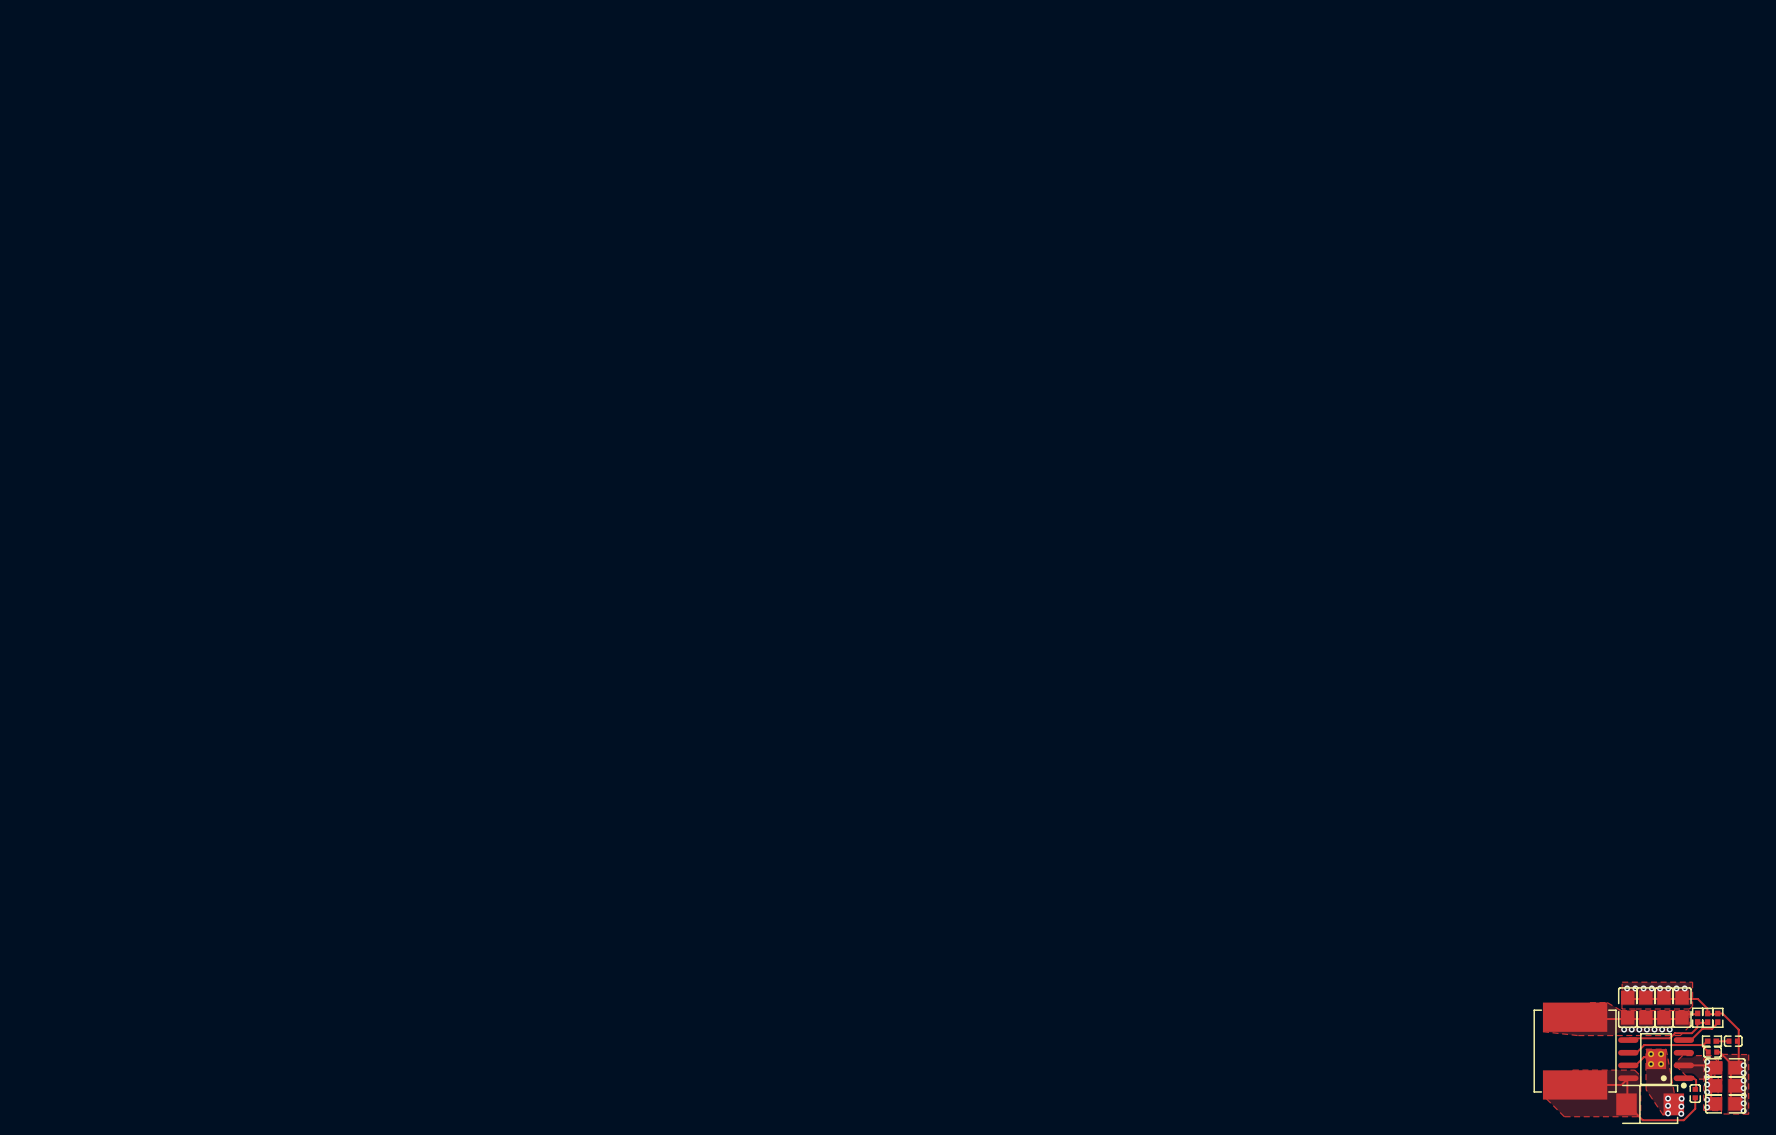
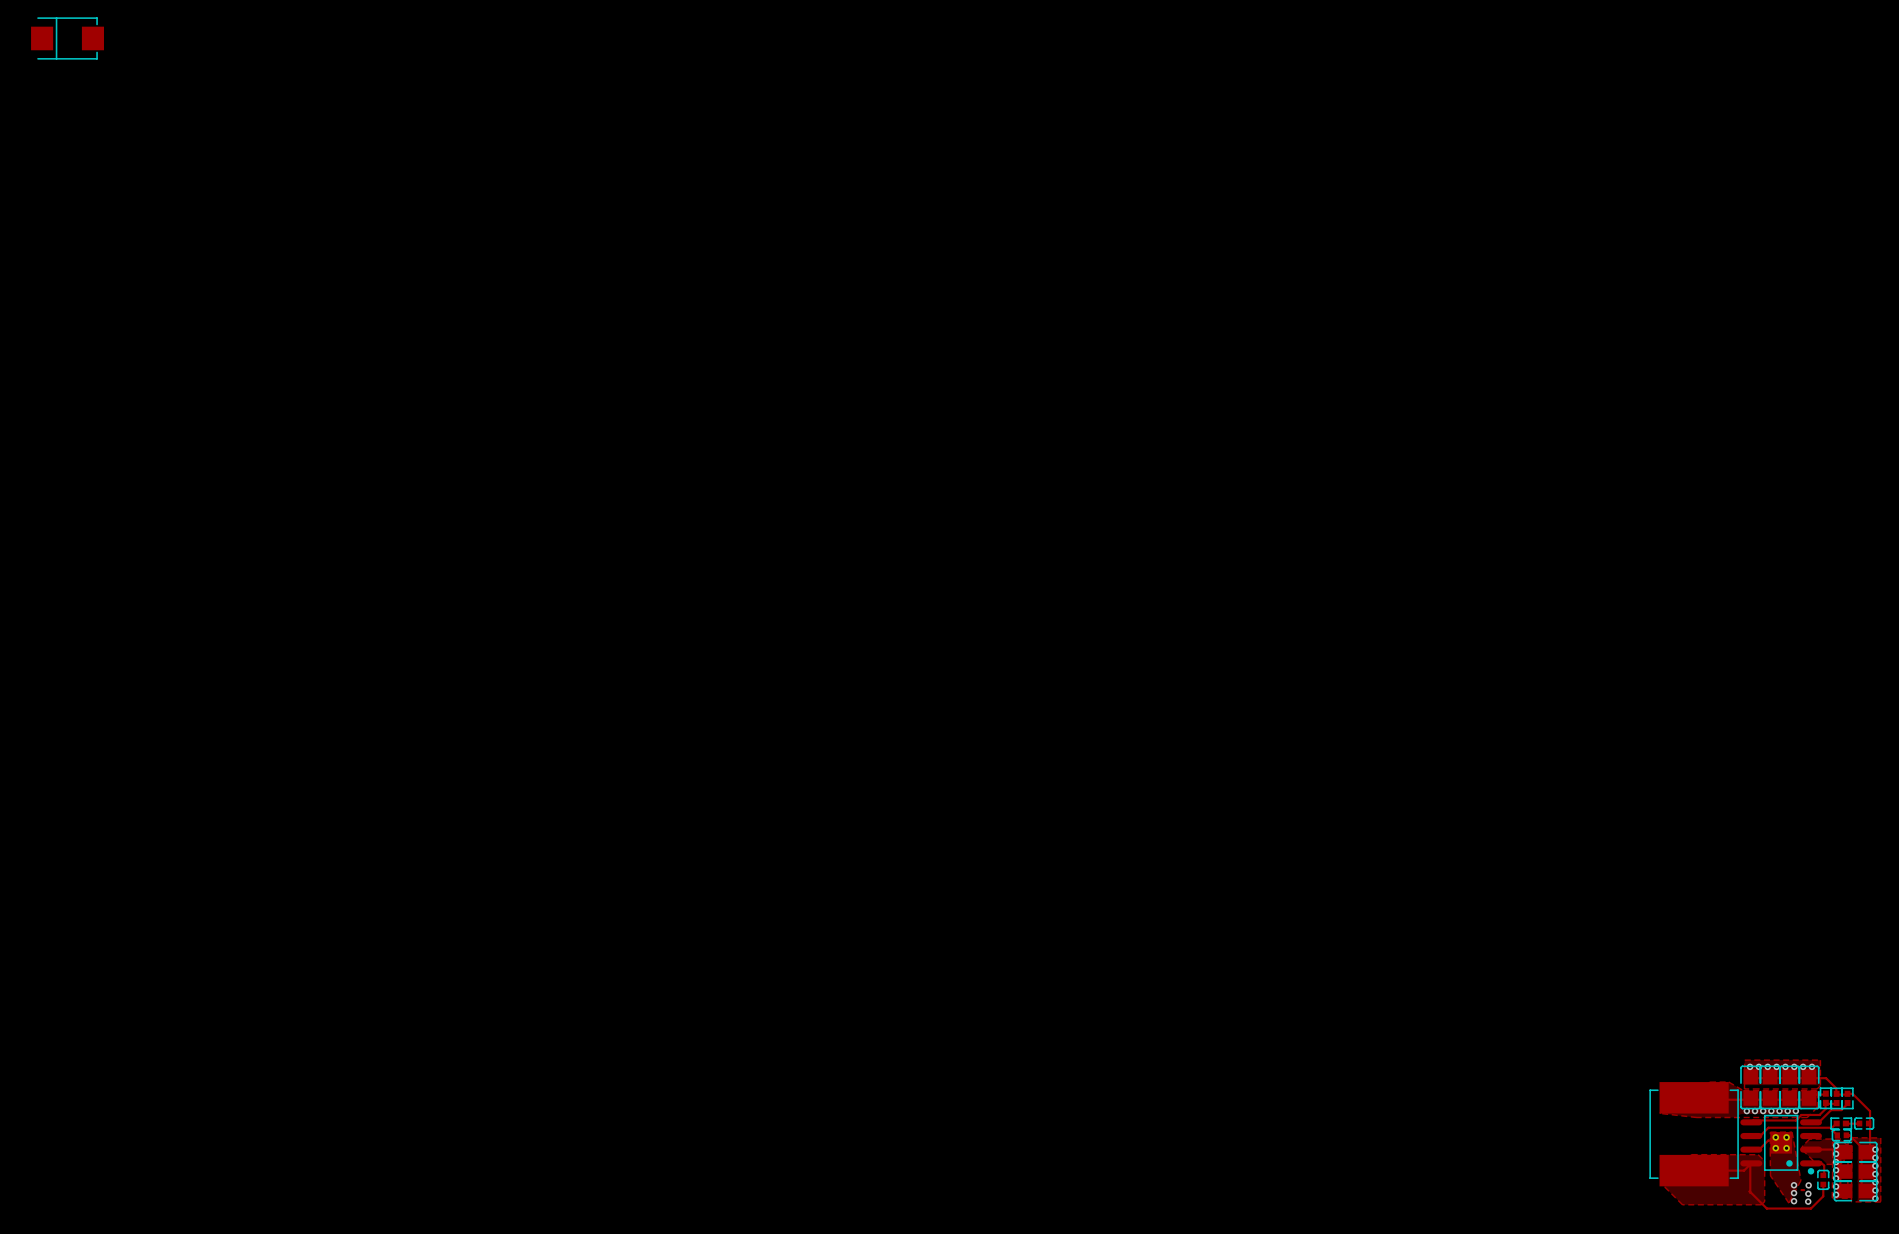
part: none -> (67, 38)
part: (1650, 1104) -> none

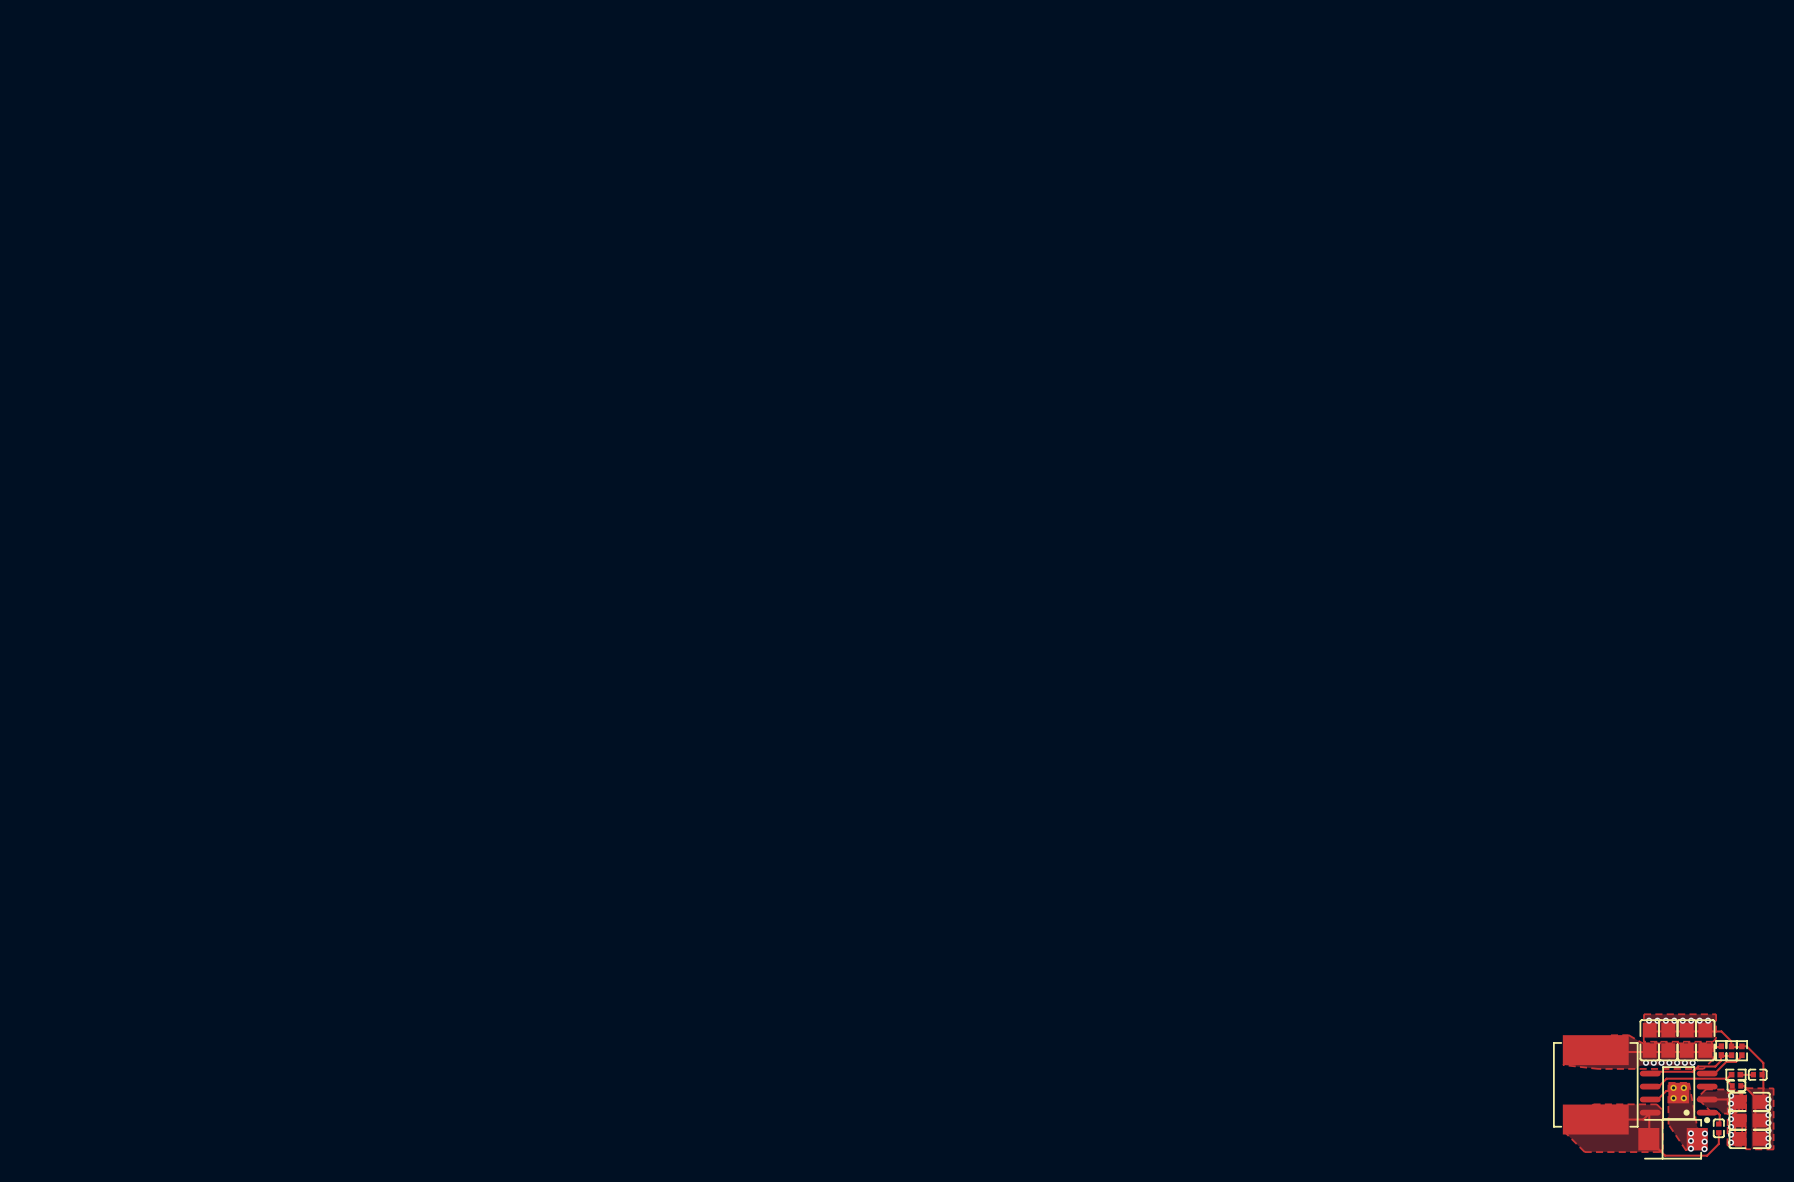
part: (67, 38) -> none
part: none -> (1673, 1139)

